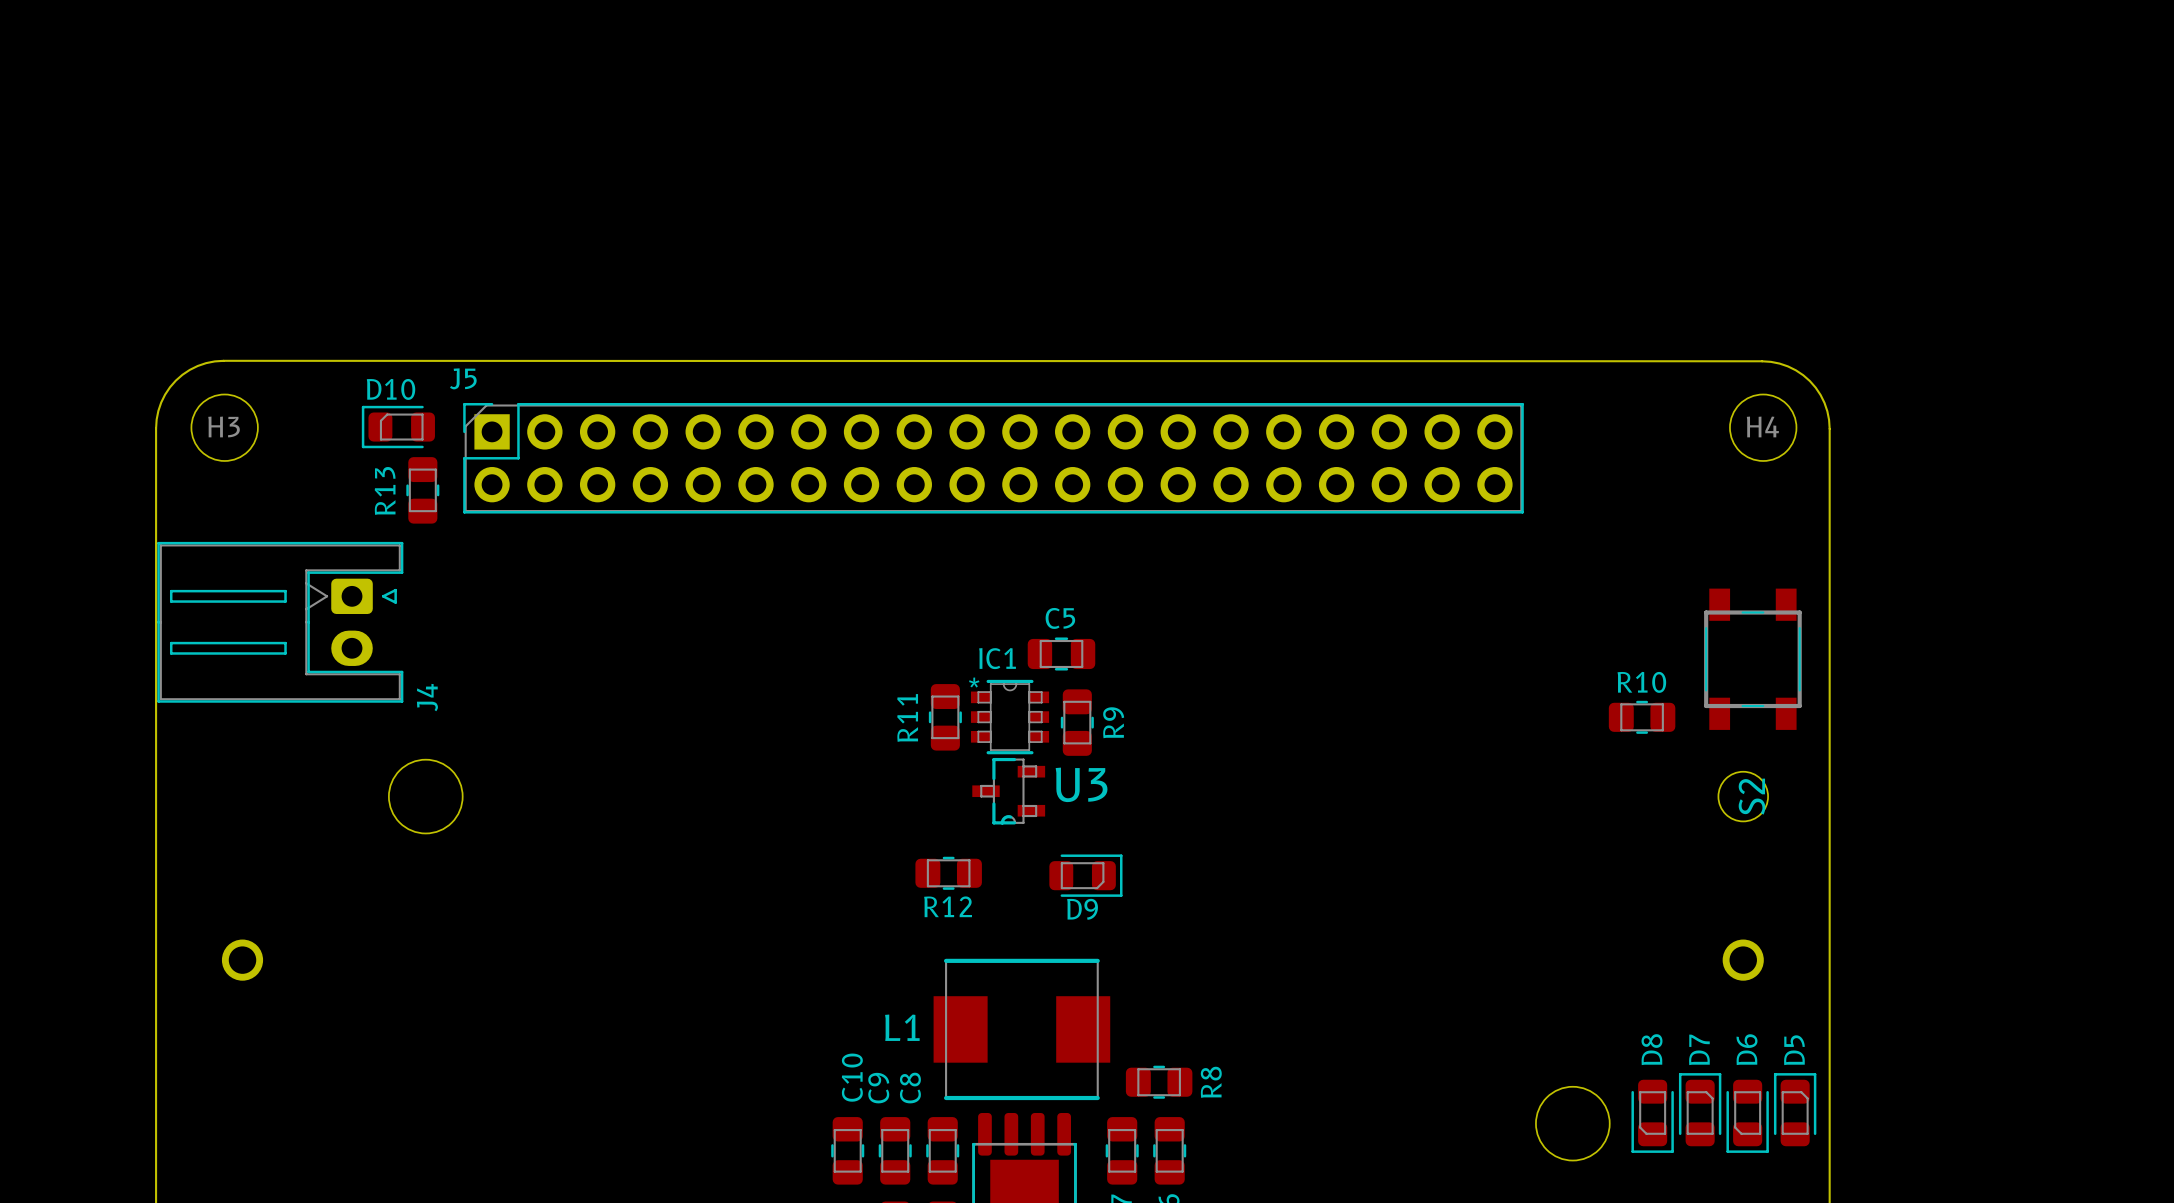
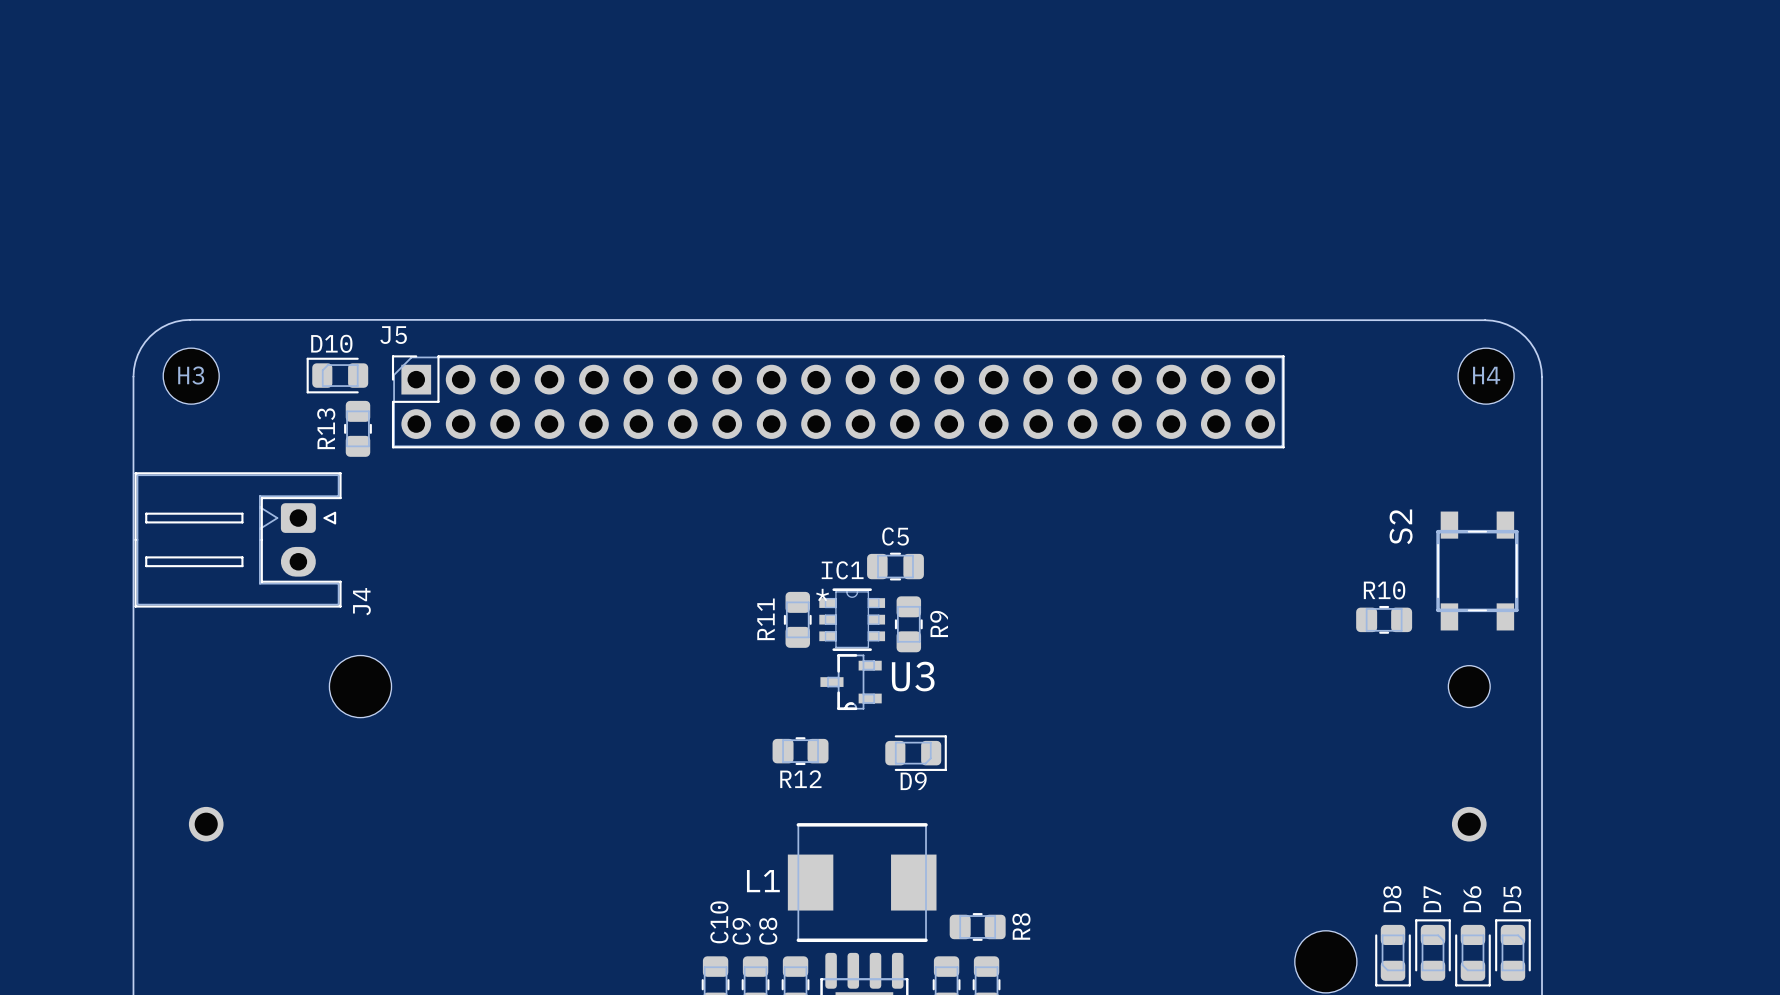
S2 name position: S2 (1752, 796) -> S2 (1401, 526)

